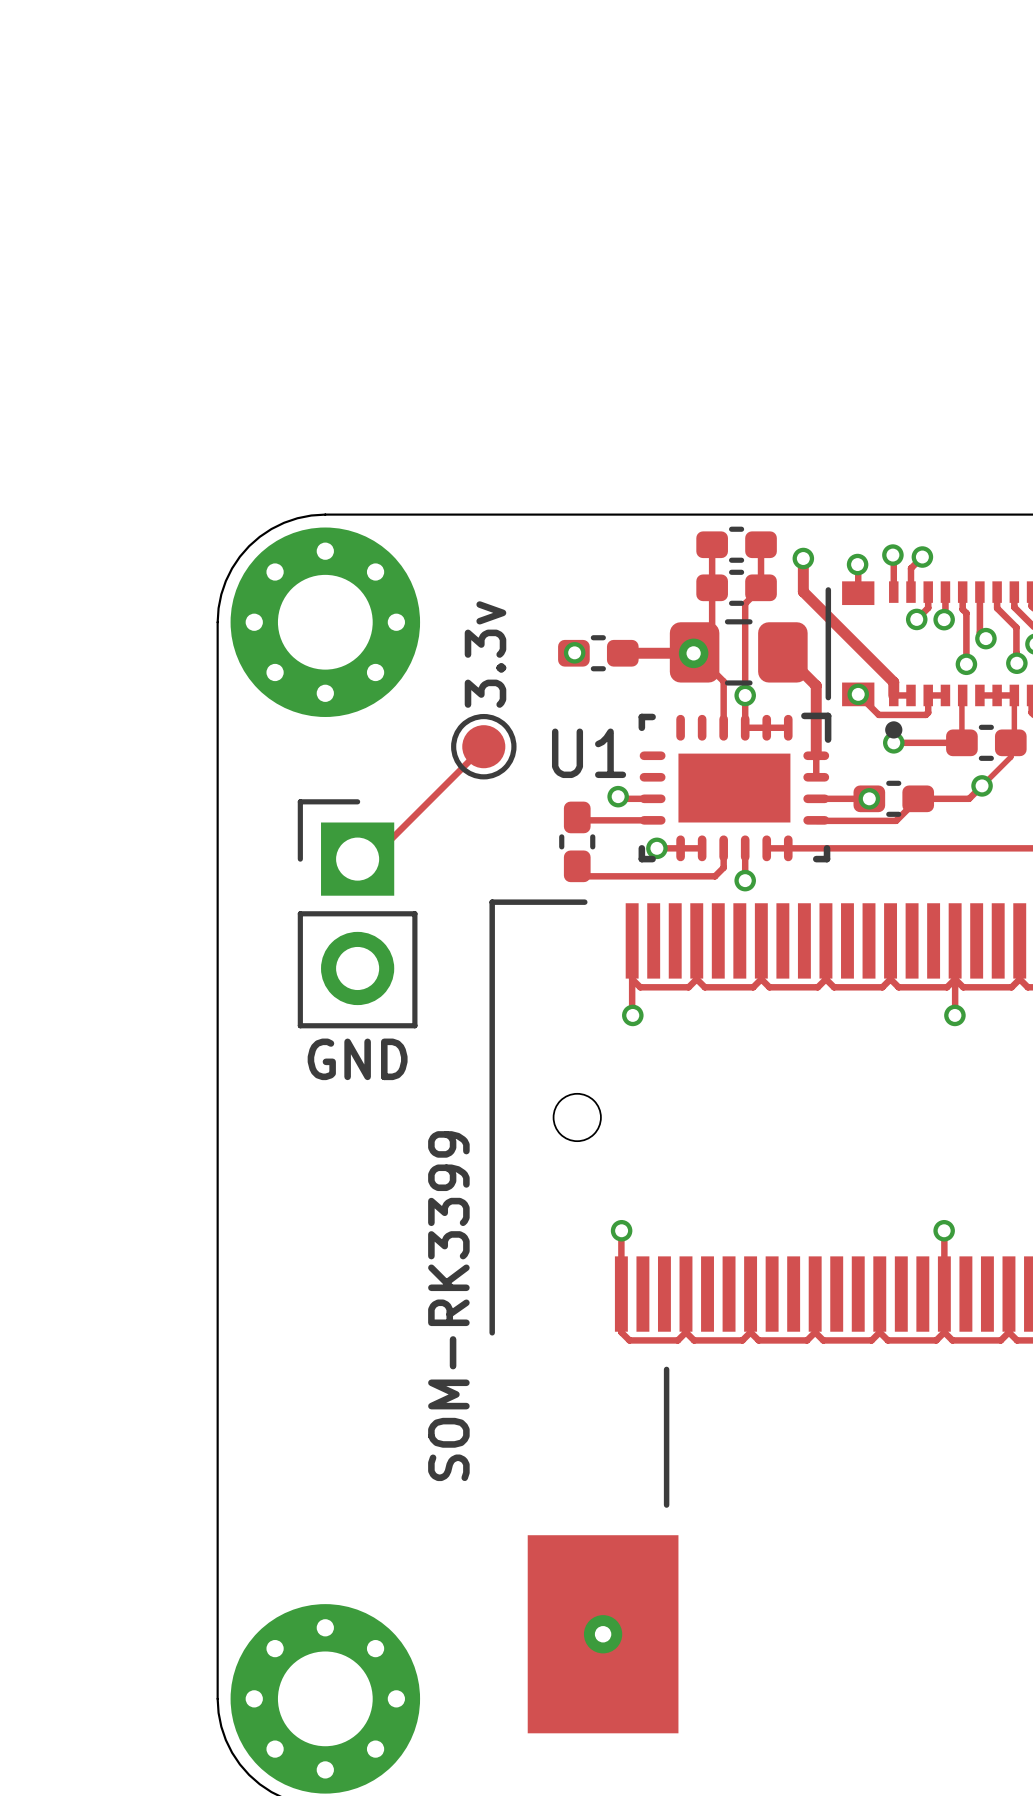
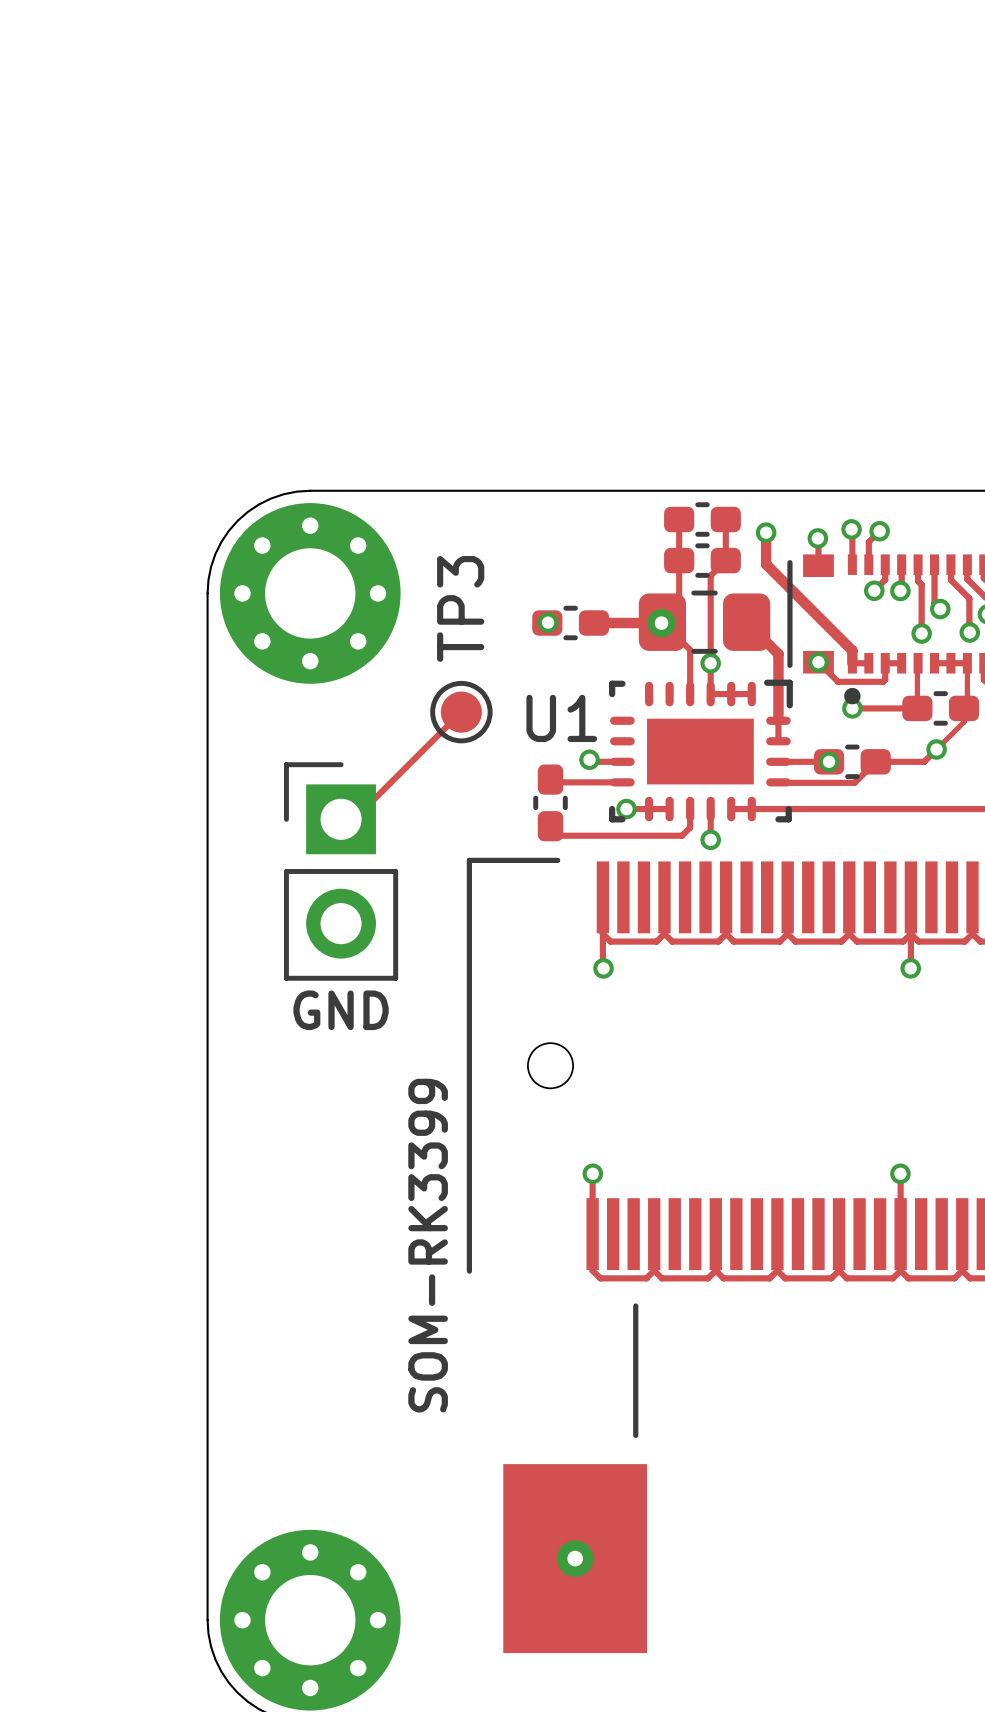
TP3 name: none -> TP3 (460, 608)
text: 3.3v (485, 654) -> none

